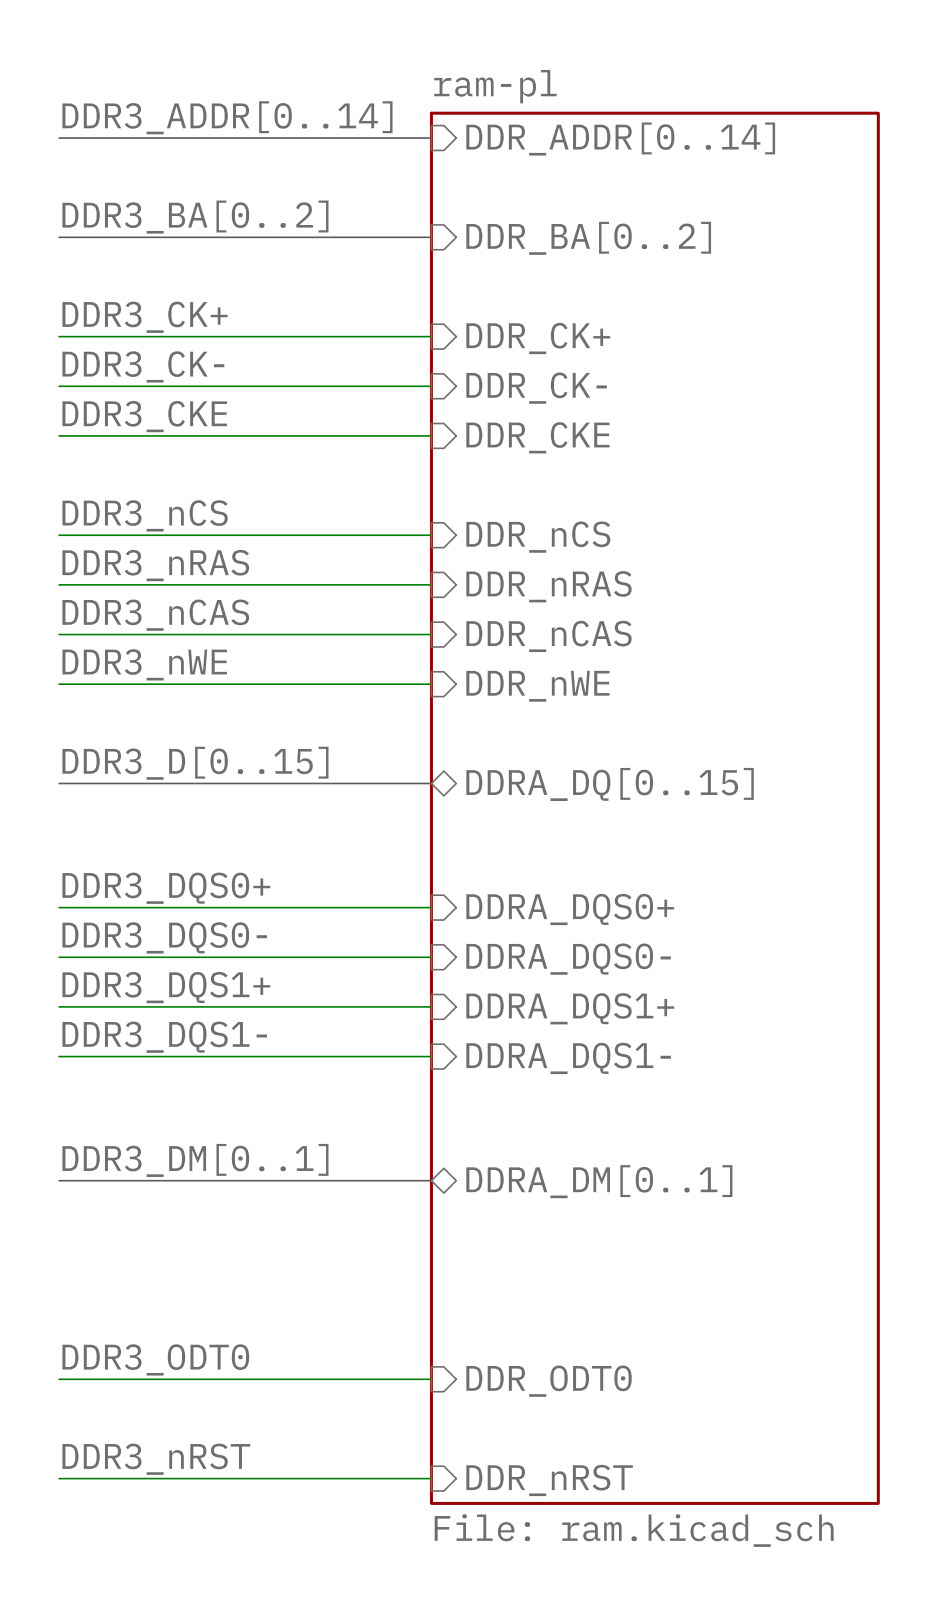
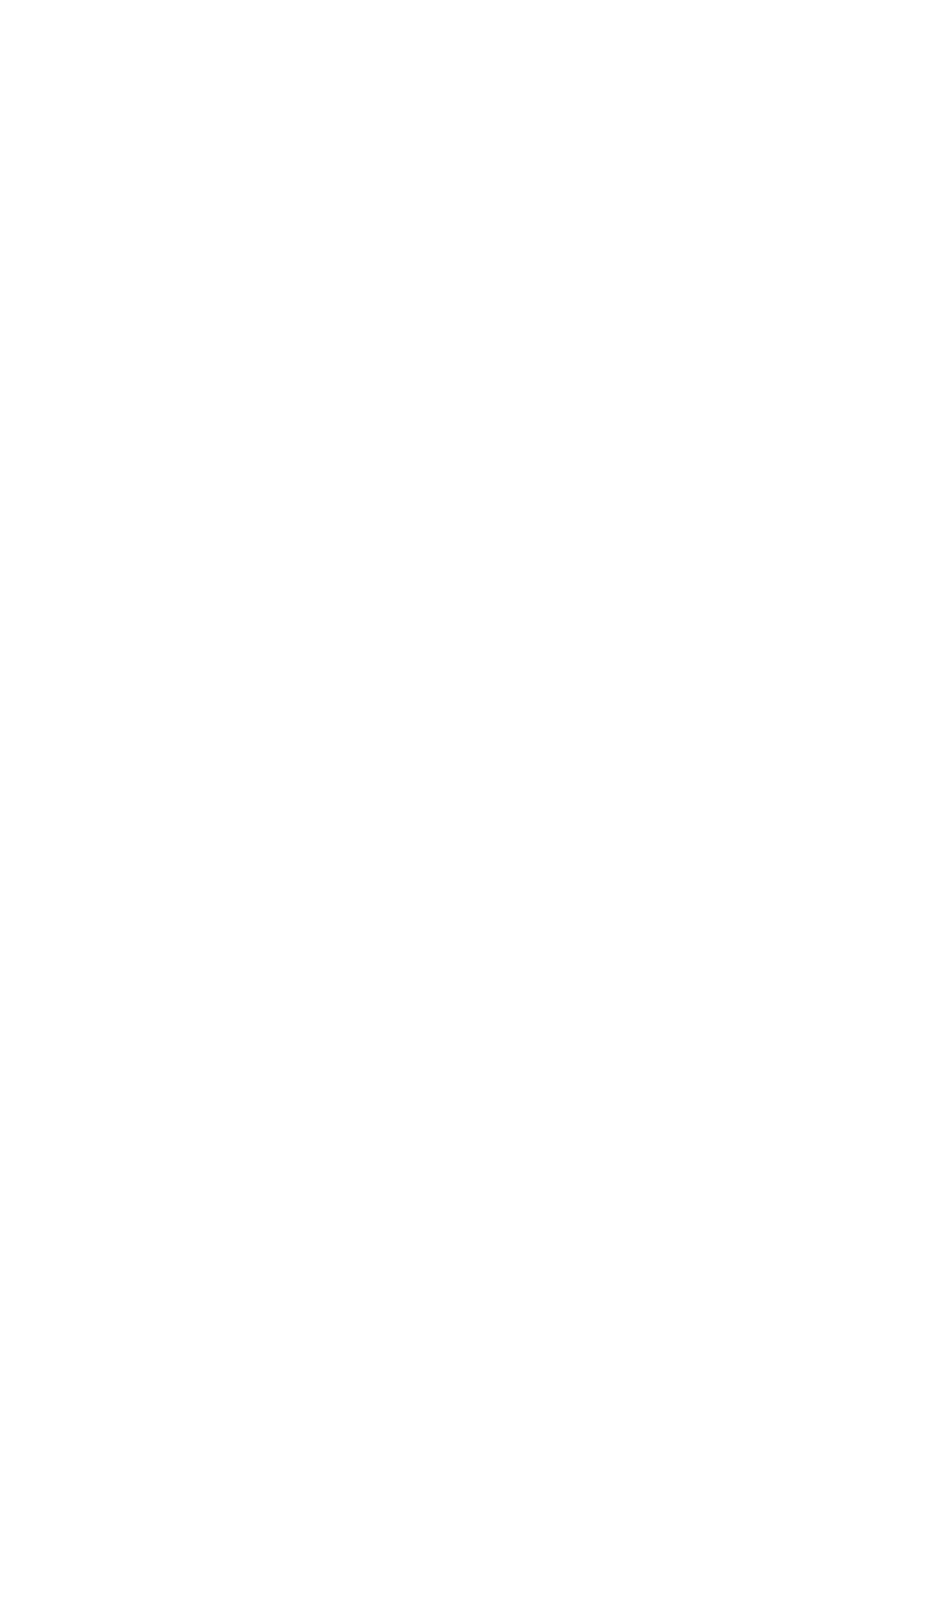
label: DDR3_ADDR[0..14] (227, 117) -> none
bus: (59, 138) (431, 138) -> none
sheet pin: DDR_ADDR[0..14] (620, 139) -> none
label: DDR3_BA[0..2] (195, 217) -> none
bus: (59, 237) (431, 237) -> none
sheet pin: DDR_BA[0..2] (588, 238) -> none
label: DDR3_CK+ (145, 317) -> none
wire: (59, 336) (431, 336) -> none
sheet pin: DDR_CK+ (538, 338) -> none
label: DDR3_CK- (143, 366) -> none
wire: (59, 386) (431, 386) -> none
sheet pin: DDR_CK- (536, 388) -> none
label: DDR3_CKE (144, 416) -> none
wire: (59, 435) (431, 435) -> none
sheet pin: DDR_CKE (537, 437) -> none
label: DDR3_nCS (145, 515) -> none
wire: (59, 535) (431, 535) -> none
sheet pin: DDR_nCS (538, 537) -> none
label: DDR3_nRAS (155, 565) -> none
wire: (59, 584) (431, 584) -> none
sheet pin: DDR_nRAS (549, 586) -> none
label: DDR3_nCAS (155, 615) -> none
wire: (59, 634) (431, 634) -> none
sheet pin: DDR_nCAS (549, 636) -> none
label: DDR3_nWE (144, 664) -> none
wire: (59, 684) (431, 684) -> none
sheet pin: DDR_nWE (537, 686) -> none
label: DDR3_D[0..15] (195, 763) -> none
bus: (59, 783) (431, 783) -> none
sheet pin: DDRA_DQ[0..15] (610, 784) -> none
sheet ram-pl: File: ram.kicad_sch (654, 808) -> none
label: DDR3_DQS0+ (166, 888) -> none
wire: (59, 907) (431, 907) -> none
sheet pin: DDRA_DQS0+ (570, 909) -> none
label: DDR3_DQS0- (164, 937) -> none
wire: (59, 957) (431, 957) -> none
sheet pin: DDRA_DQS0- (568, 959) -> none
label: DDR3_DQS1+ (166, 987) -> none
wire: (59, 1006) (431, 1006) -> none
sheet pin: DDRA_DQS1+ (570, 1008) -> none
label: DDR3_DQS1- (164, 1037) -> none
wire: (59, 1056) (431, 1056) -> none
sheet pin: DDRA_DQS1- (568, 1058) -> none
label: DDR3_DM[0..1] (195, 1160) -> none
bus: (59, 1180) (431, 1180) -> none
sheet pin: DDRA_DM[0..1] (599, 1181) -> none
label: DDR3_ODT0 (155, 1359) -> none
wire: (59, 1379) (431, 1379) -> none
sheet pin: DDR_ODT0 (549, 1381) -> none
label: DDR3_nRST (156, 1459) -> none
wire: (59, 1478) (431, 1478) -> none
sheet pin: DDR_nRST (549, 1480) -> none

